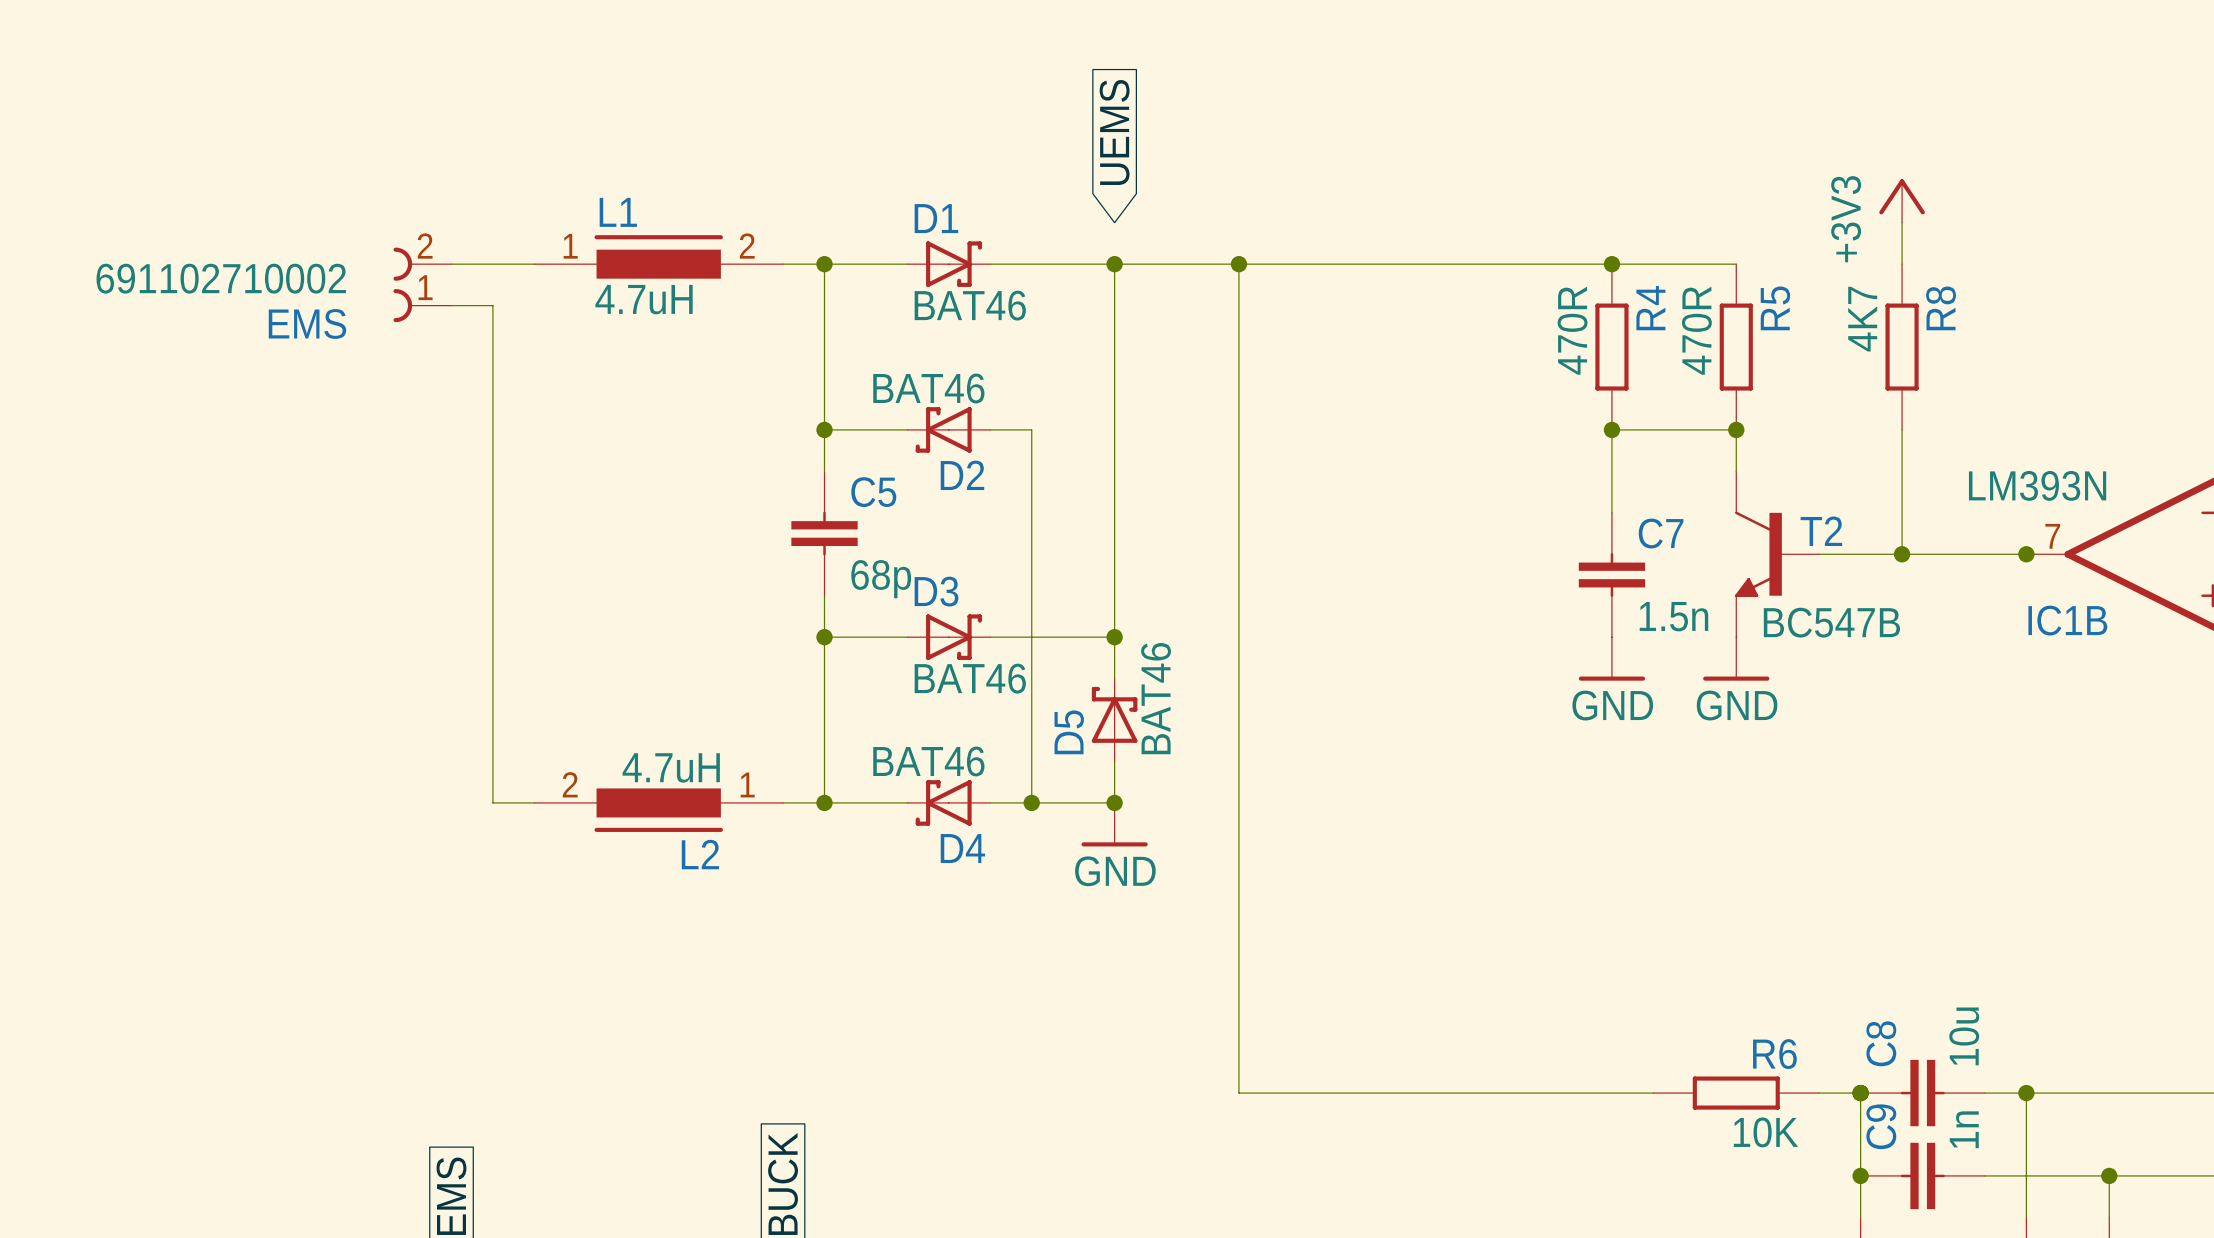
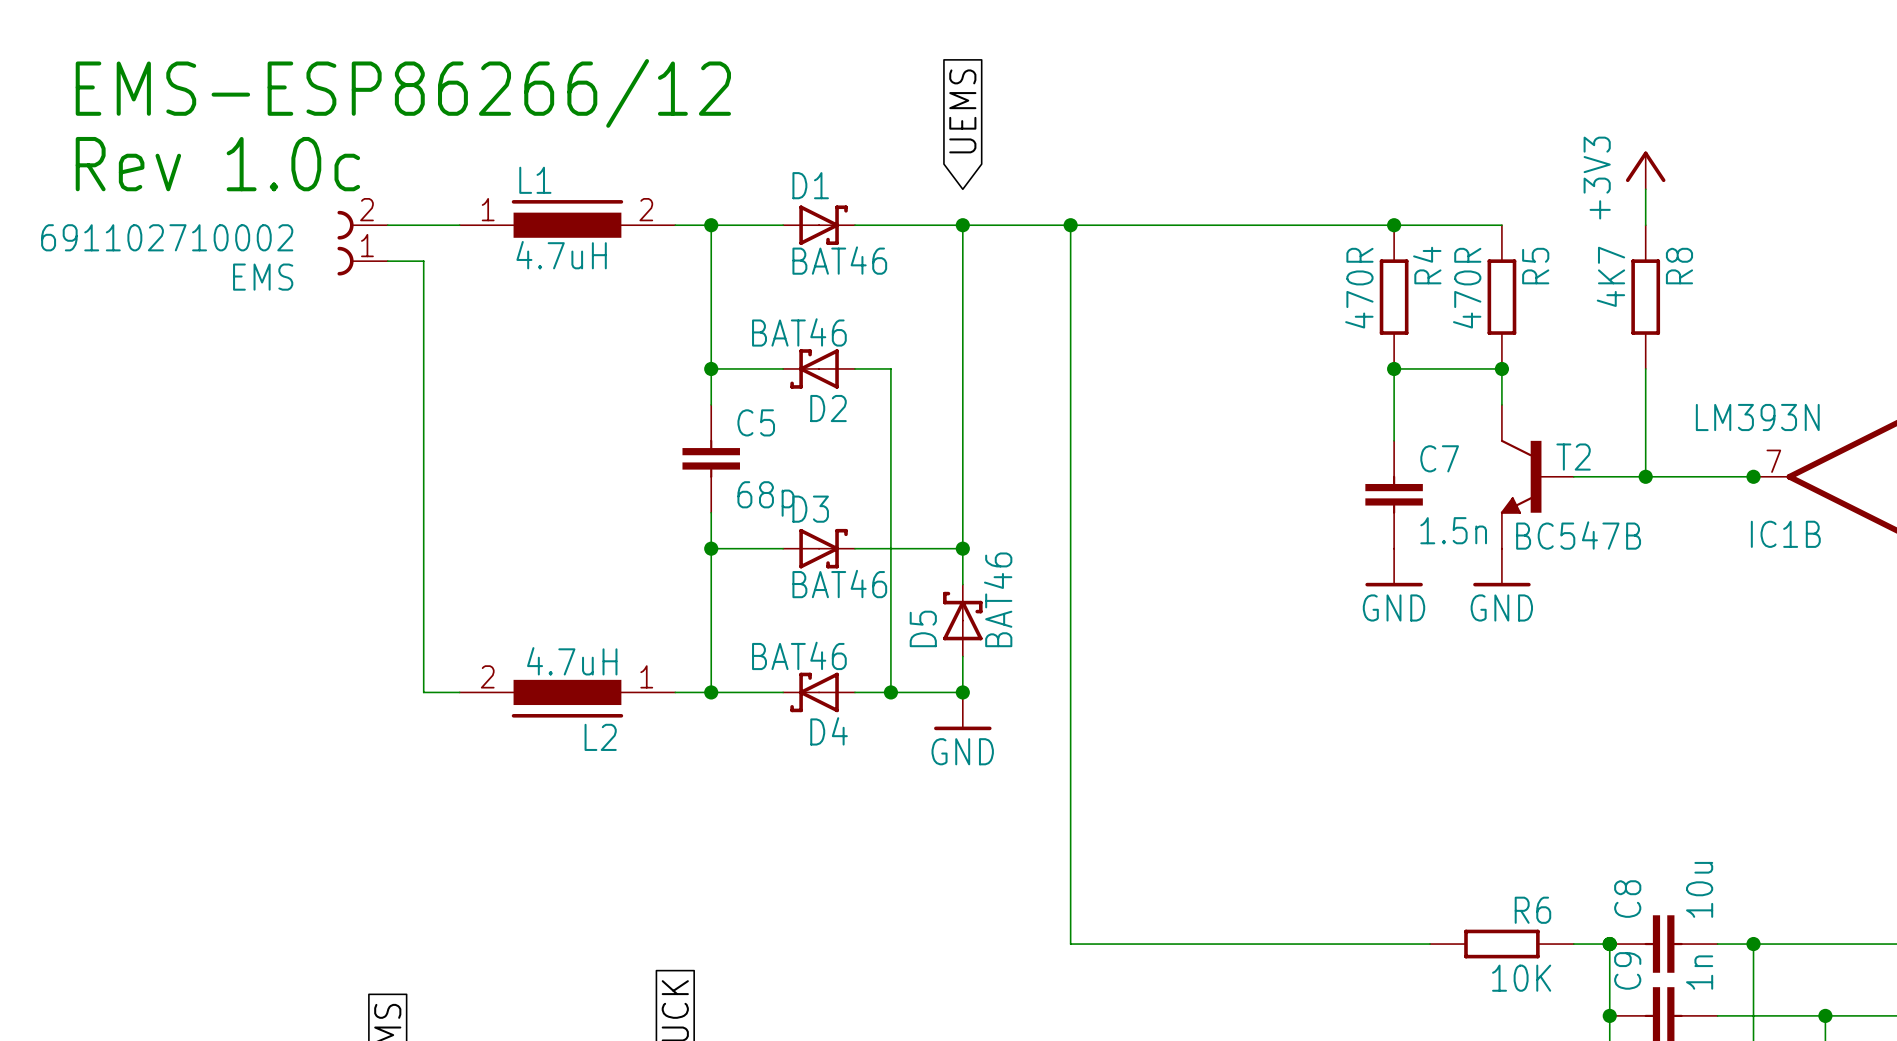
text: none -> EMS-ESP86266/12 (403, 93)
text: none -> Rev 1.0c (217, 164)

